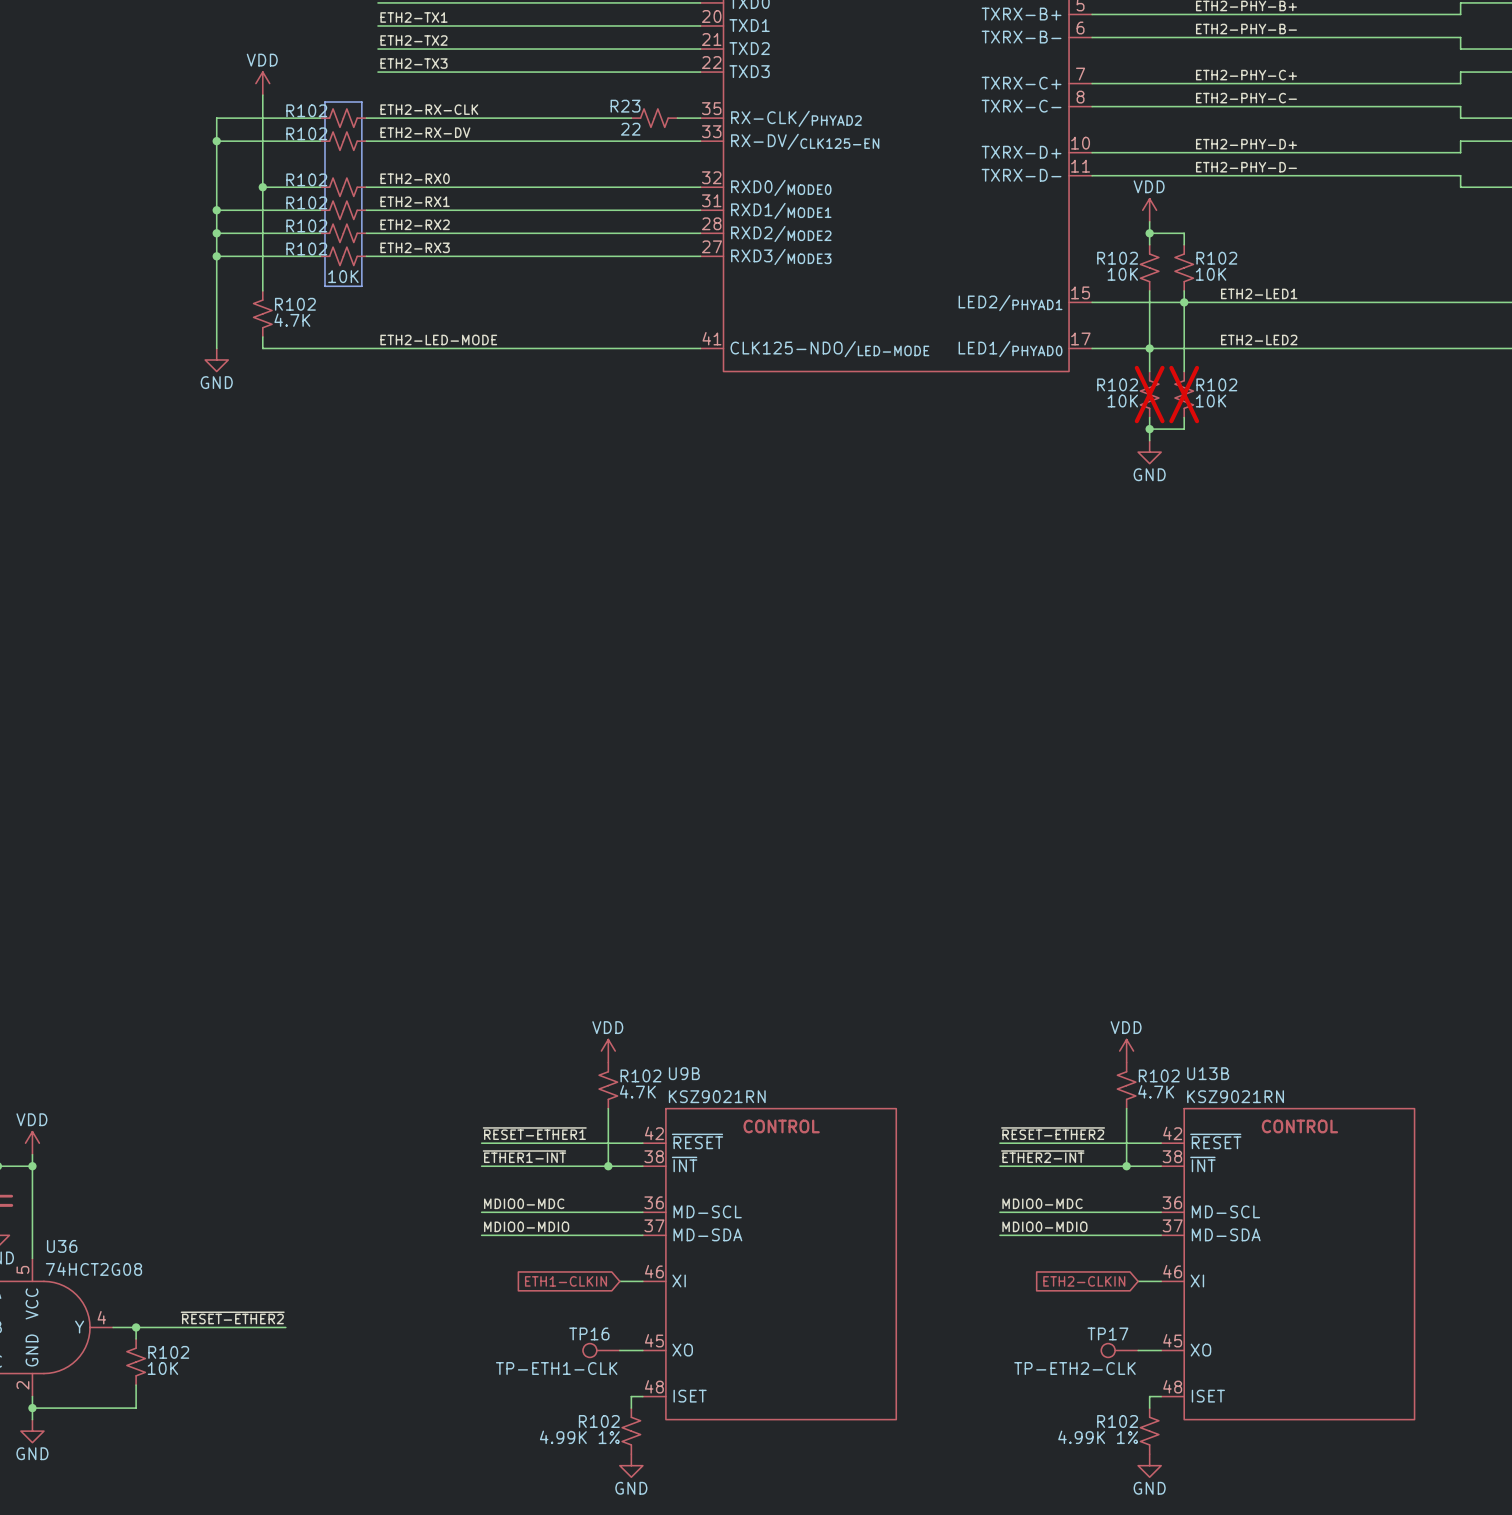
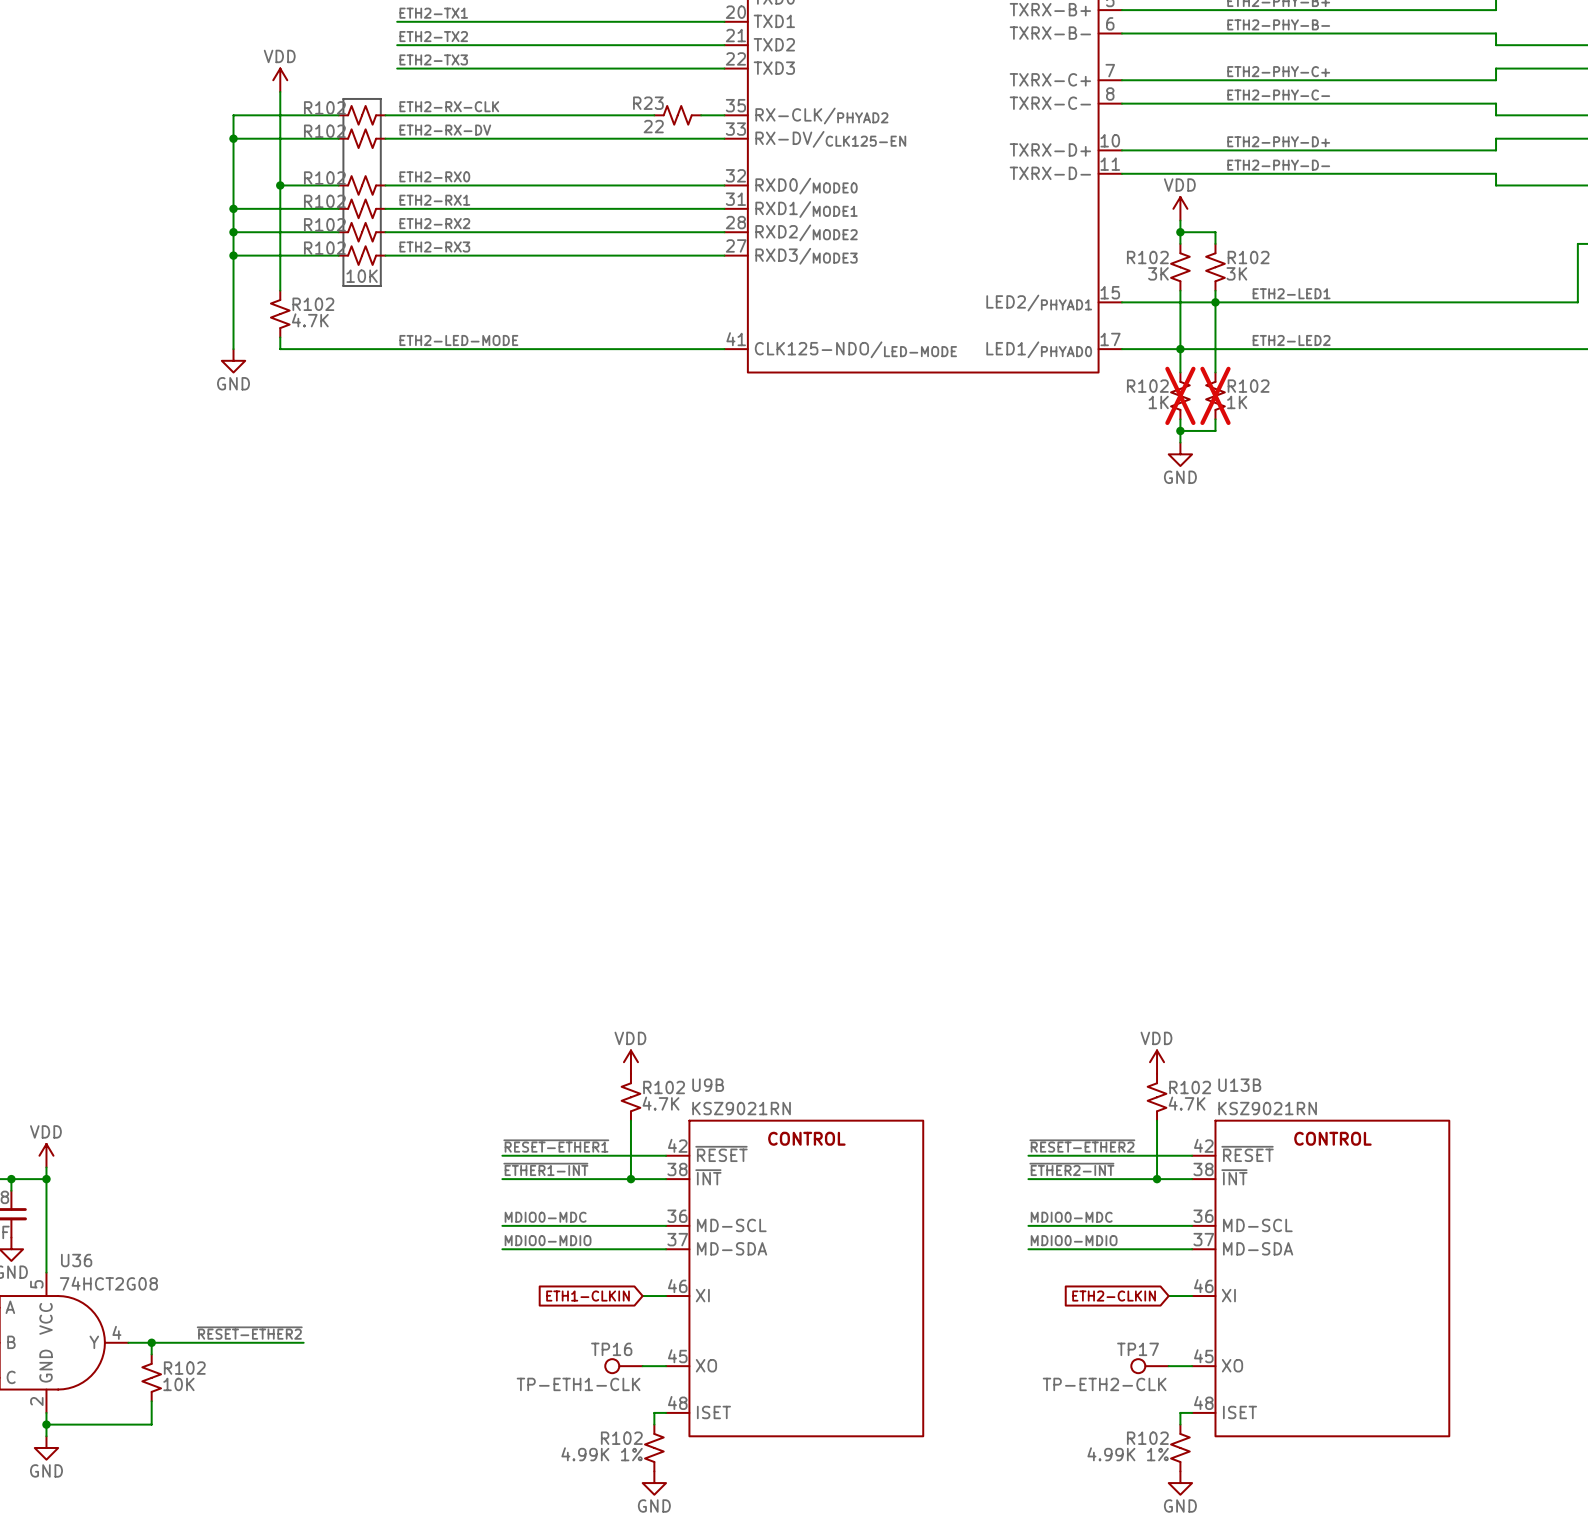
R102 value: 10K (1122, 274) -> 3K (1158, 273)
R102 value: 10K (1211, 274) -> 3K (1236, 273)
R102 value: 10K (1122, 401) -> 1K (1158, 402)
R102 value: 10K (1211, 401) -> 1K (1237, 402)

